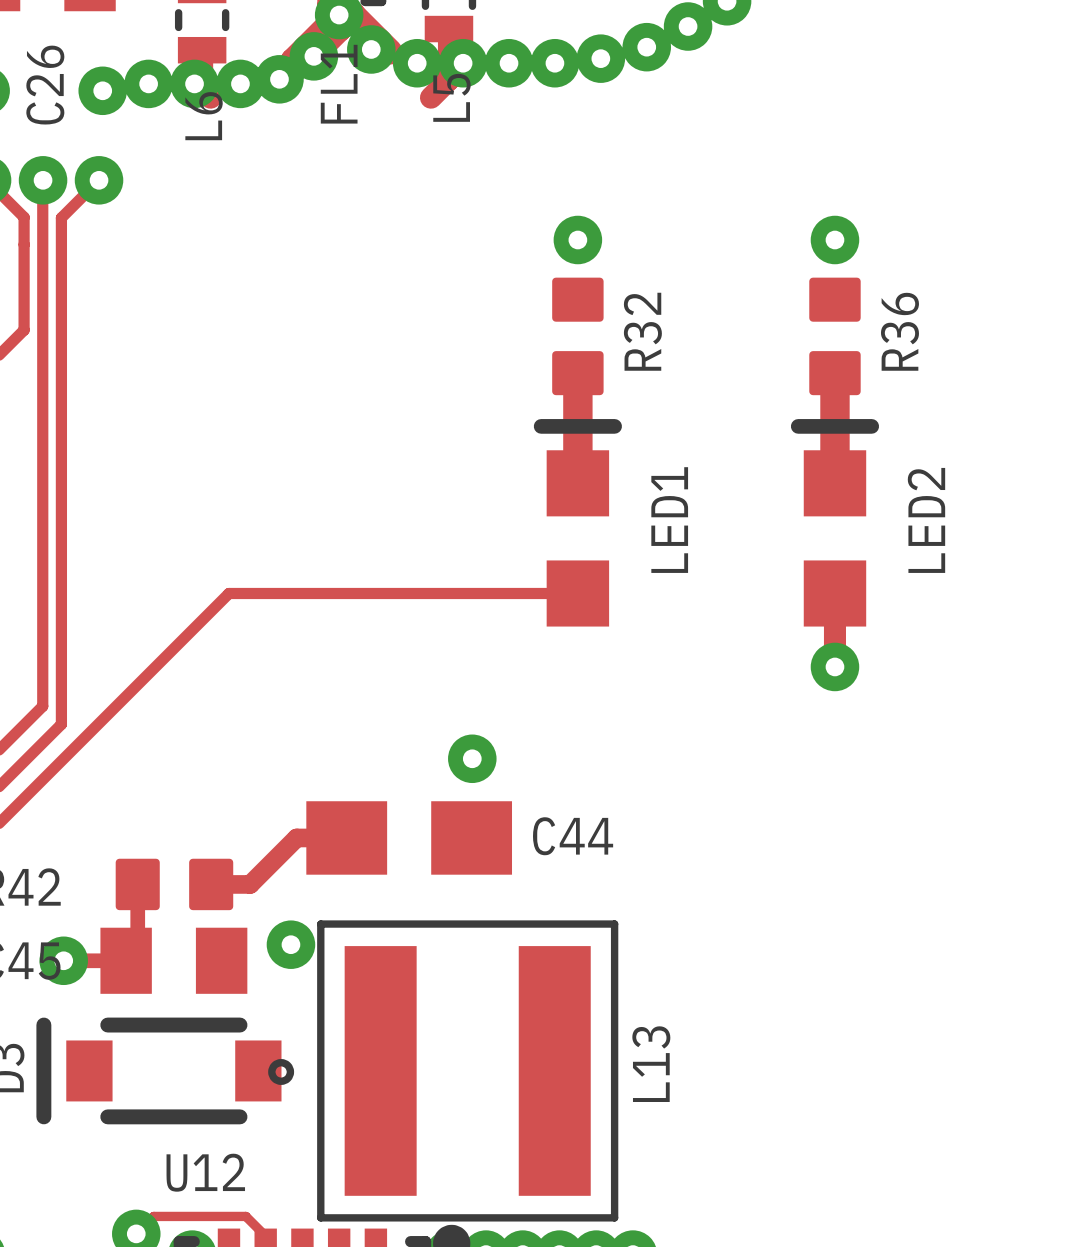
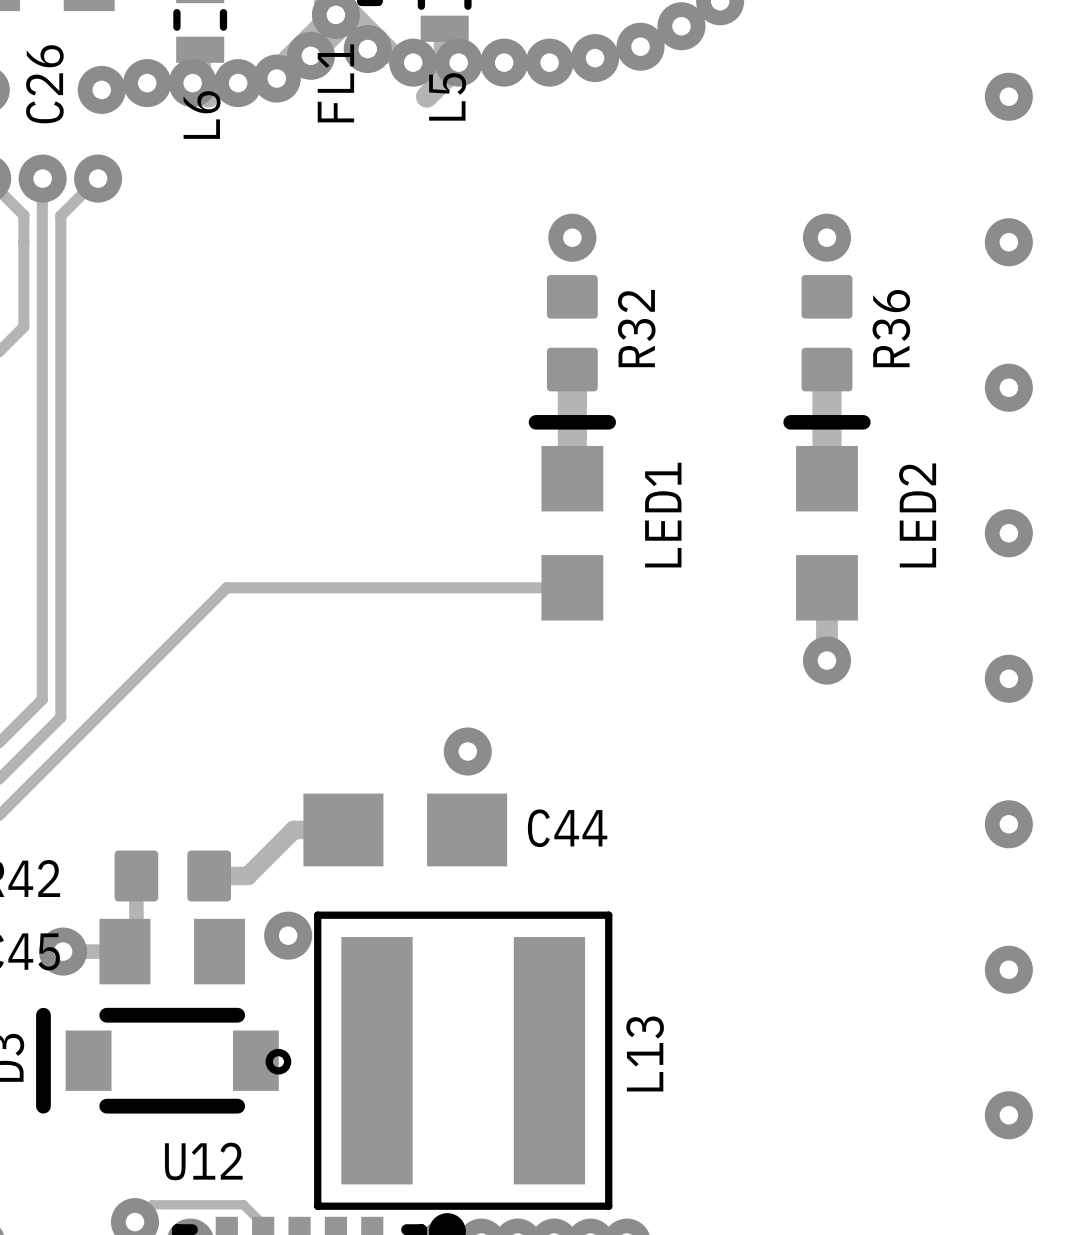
via: none -> (1008, 96)
via: none -> (1008, 242)
via: none -> (1008, 387)
via: none -> (1008, 533)
via: none -> (1008, 678)
via: none -> (1008, 824)
via: none -> (1008, 969)
via: none -> (1008, 1115)

